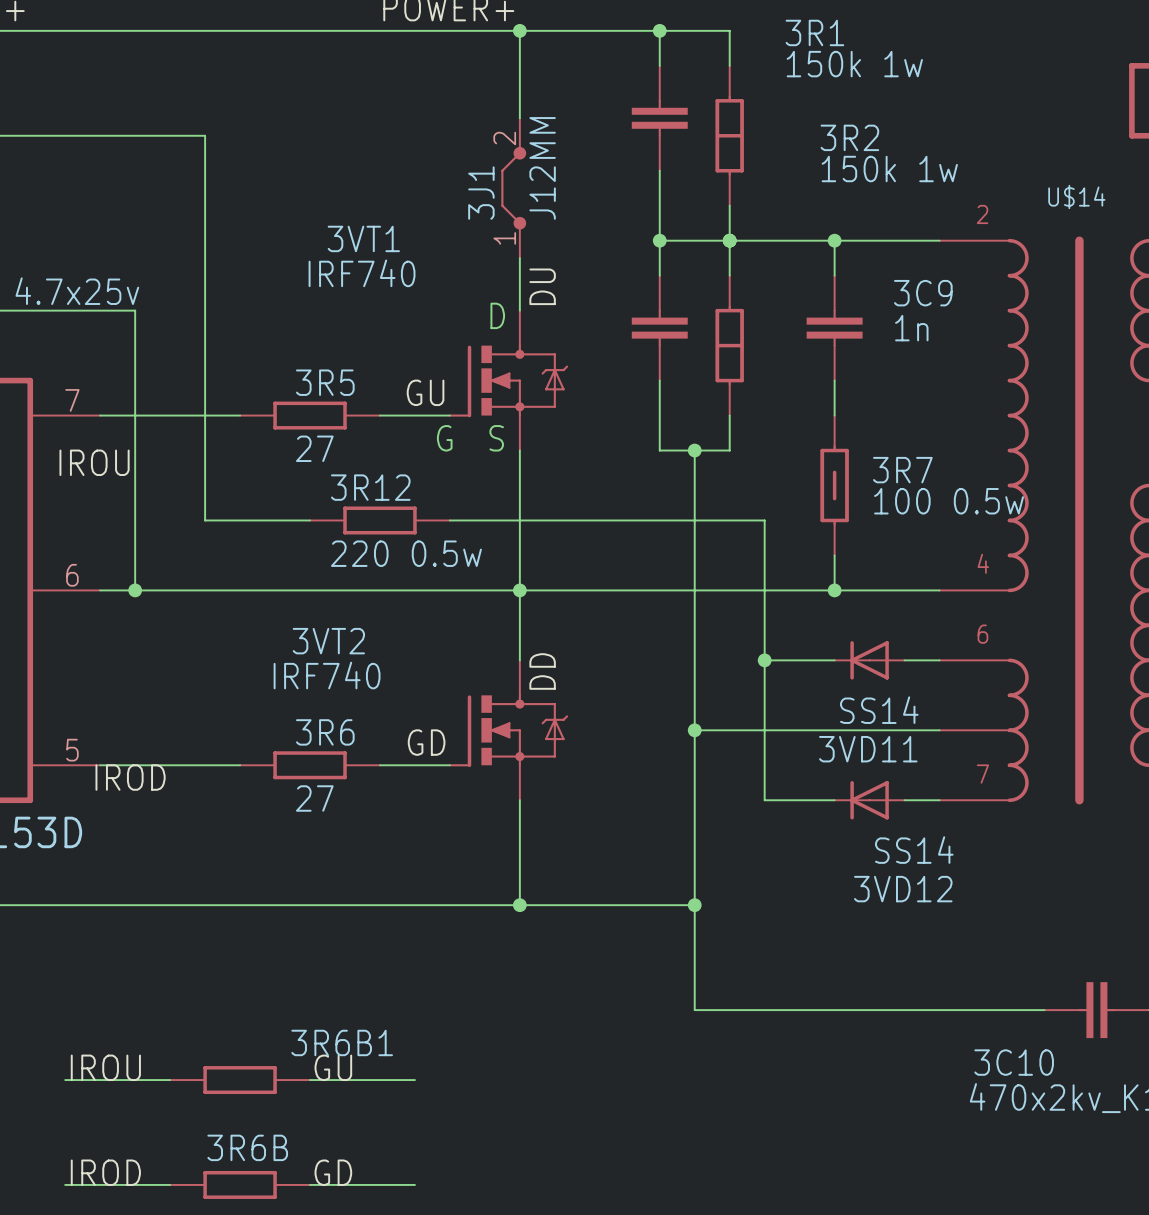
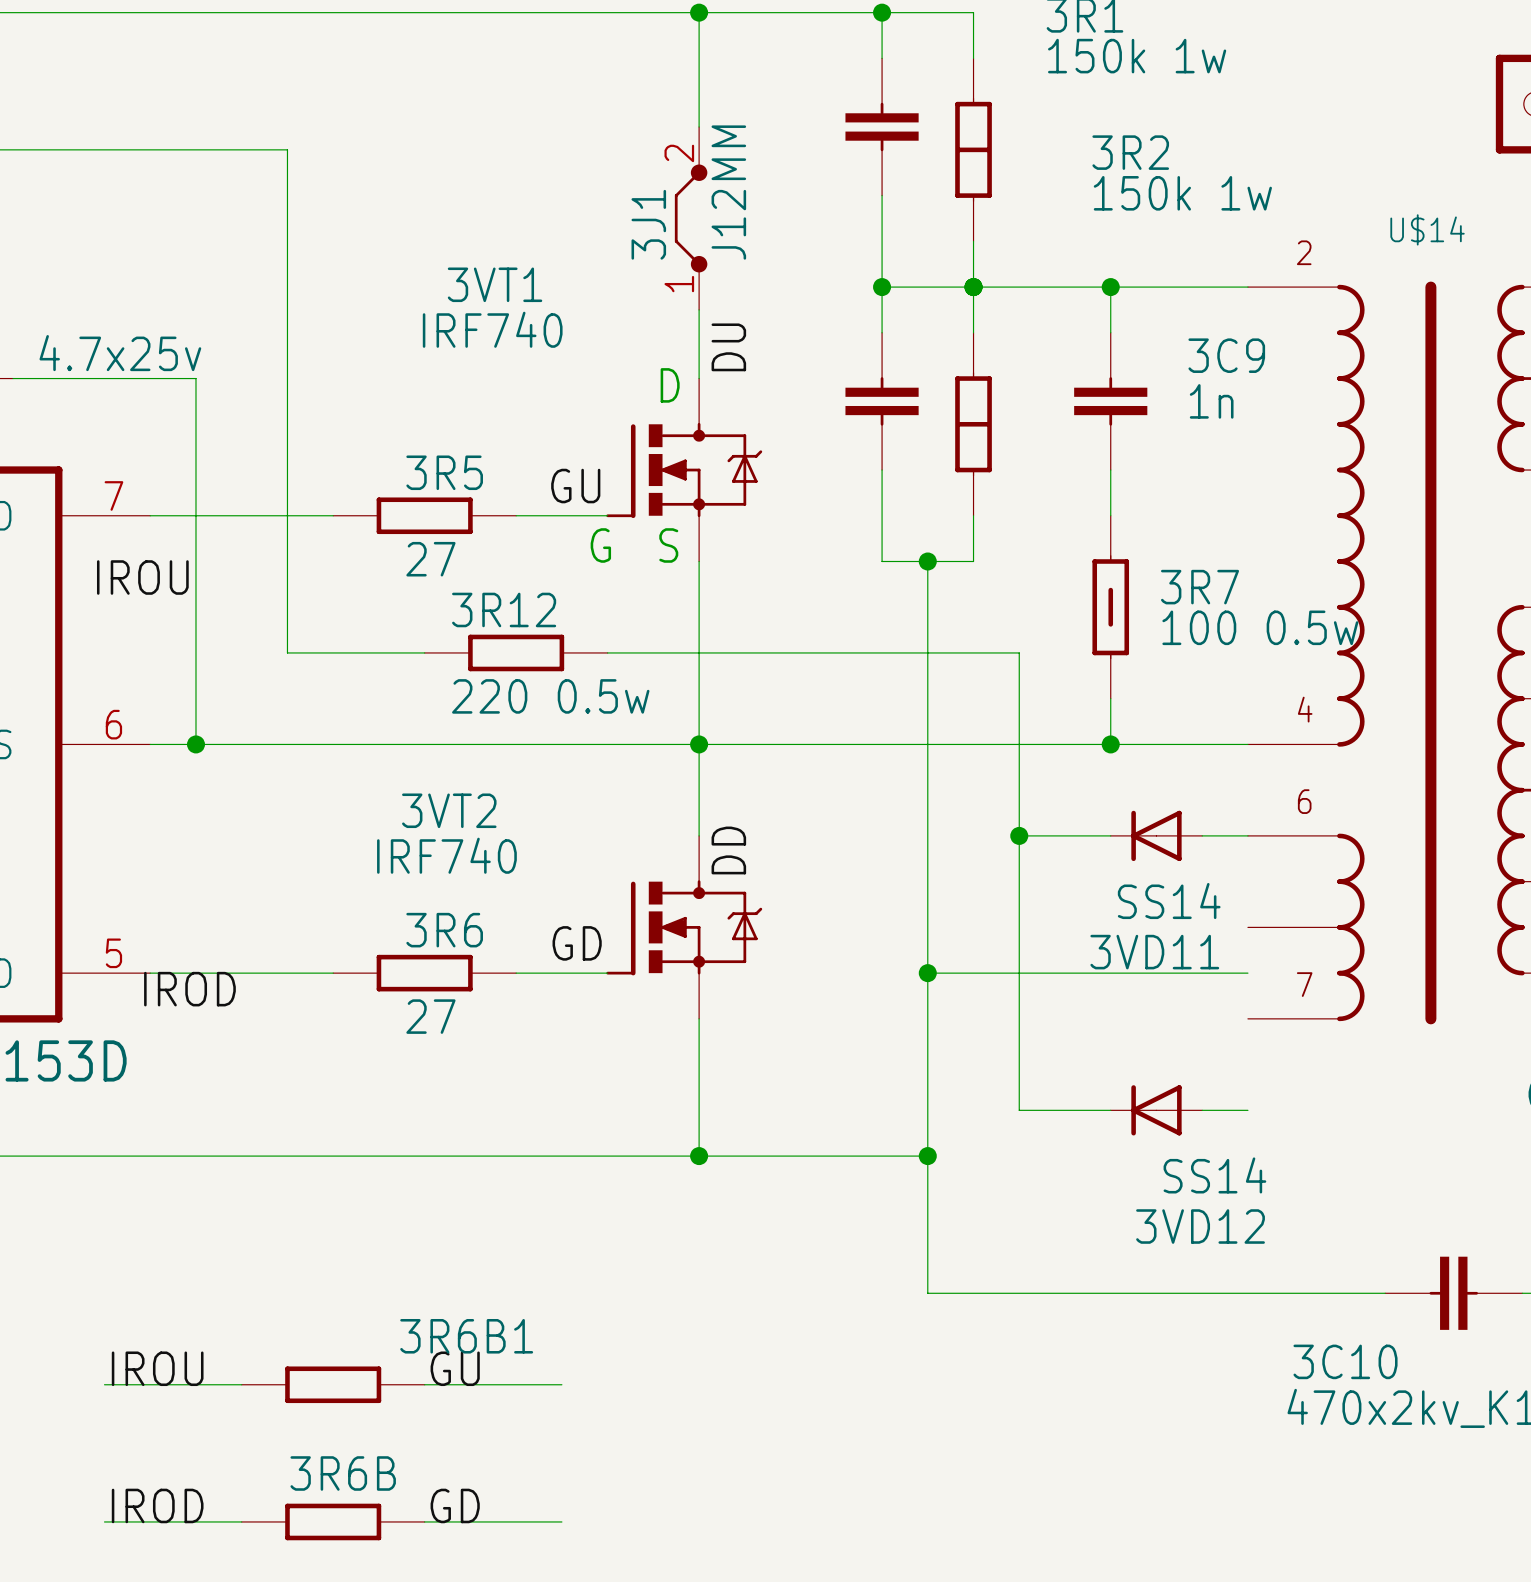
wire: (694, 730) (939, 730) -> (927, 973) (1247, 973)
junction position: (694, 730) -> (927, 973)
wire: (764, 800) (834, 800) -> (1019, 1018) (1019, 1110) (1110, 1110)
3VD12 position: (869, 800) -> (1156, 1110)
wire: (904, 800) (939, 800) -> (1202, 1110) (1247, 1110)

